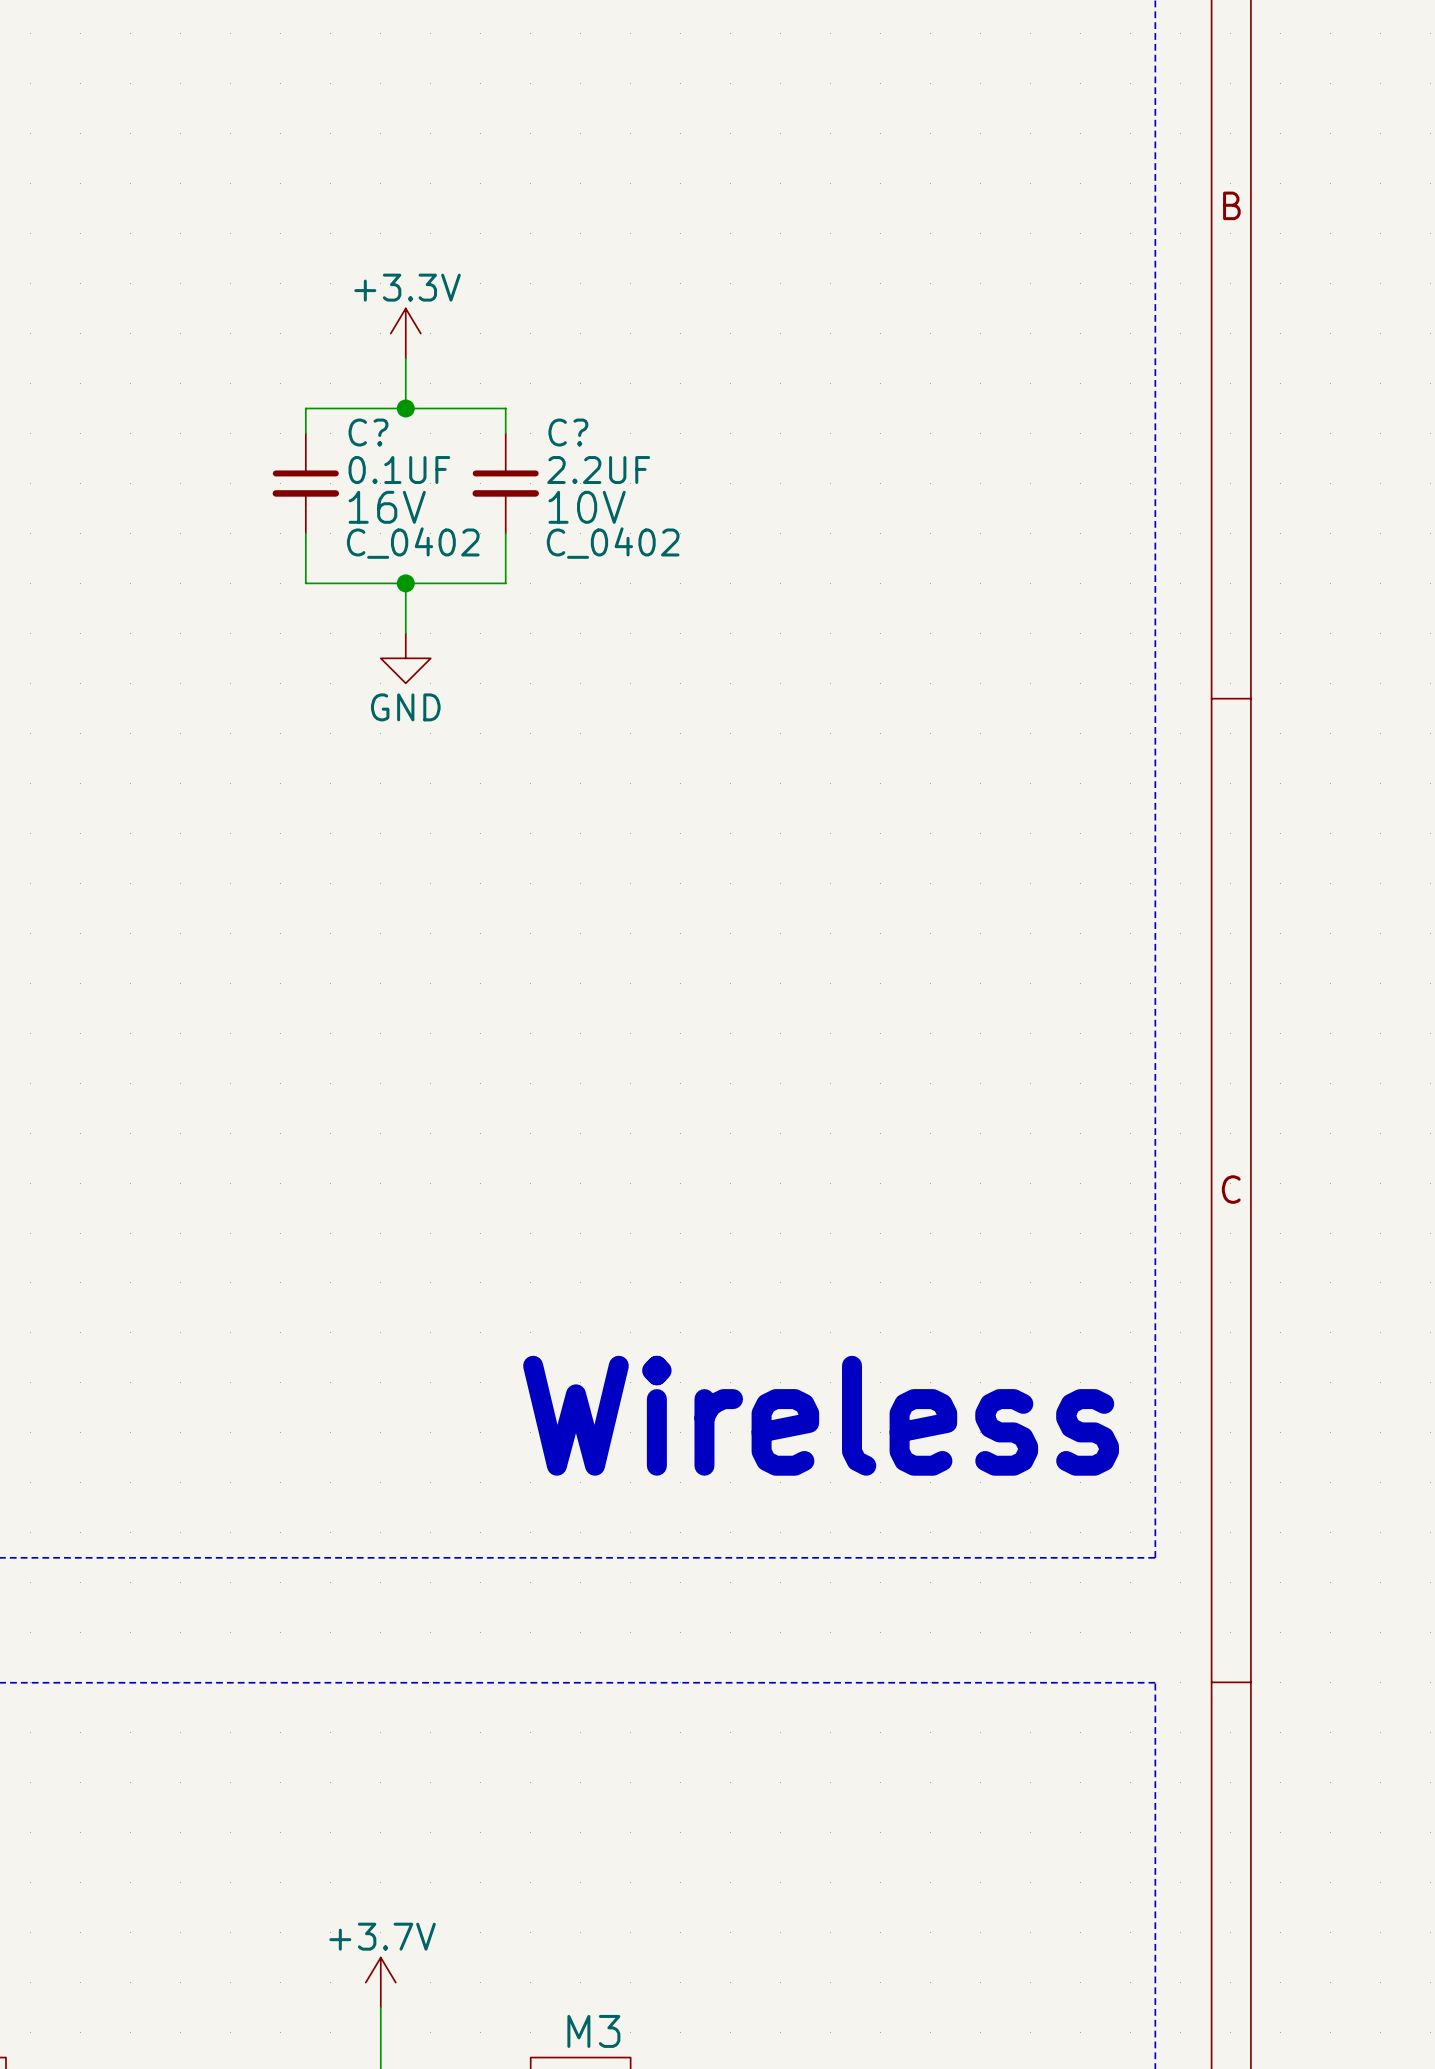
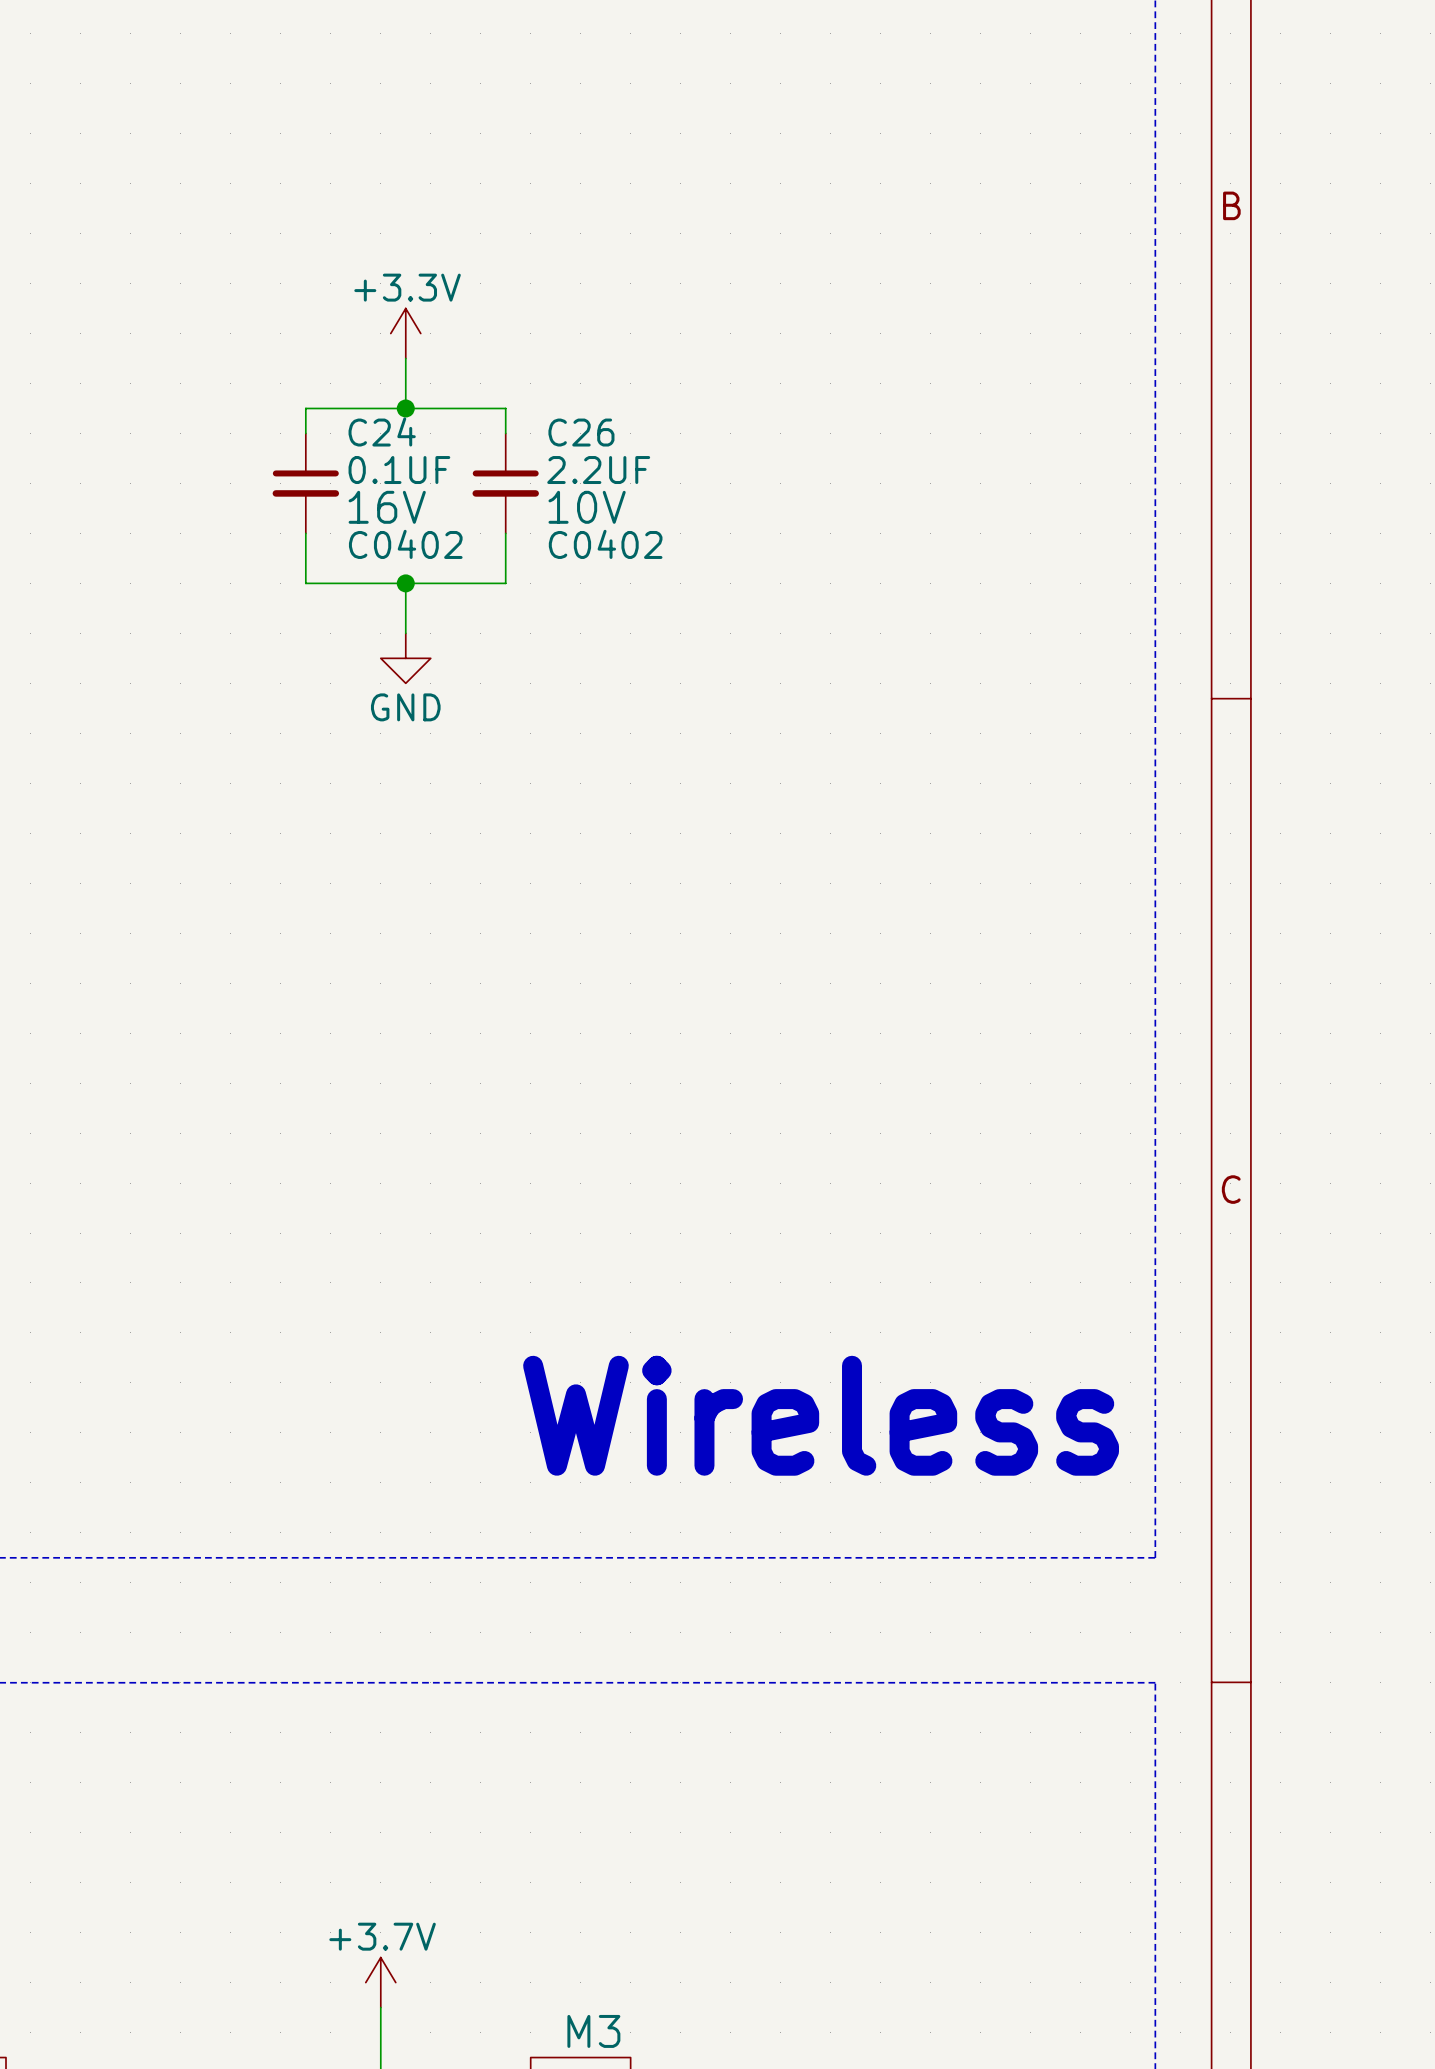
C? name: C? (368, 432) -> C24 (382, 431)
C? name: C? (568, 432) -> C26 (581, 432)
C? text: C_0402 (413, 543) -> C0402 (405, 544)
C? text: C_0402 (613, 543) -> C0402 (605, 544)

